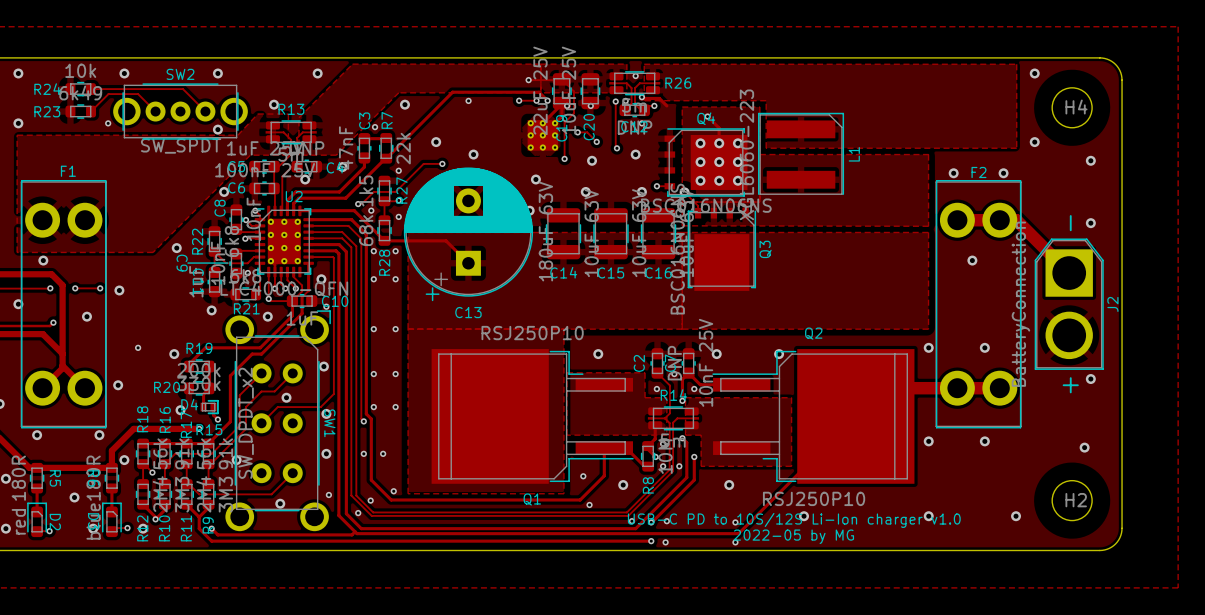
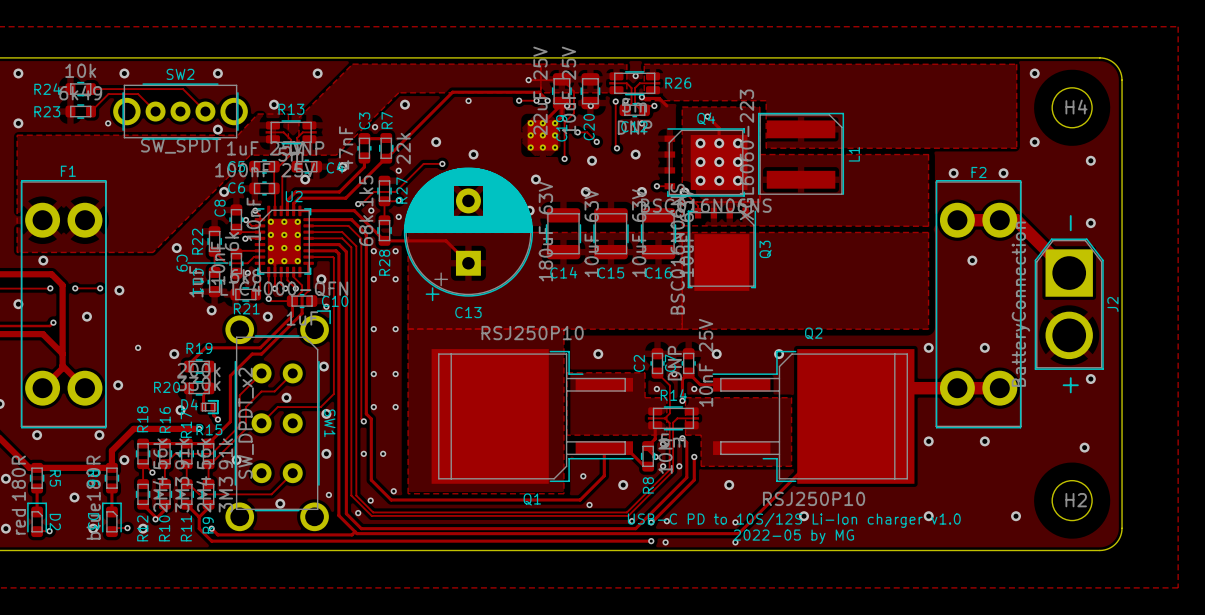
R22 value: 6k8 (231, 241) -> 6k (231, 241)

